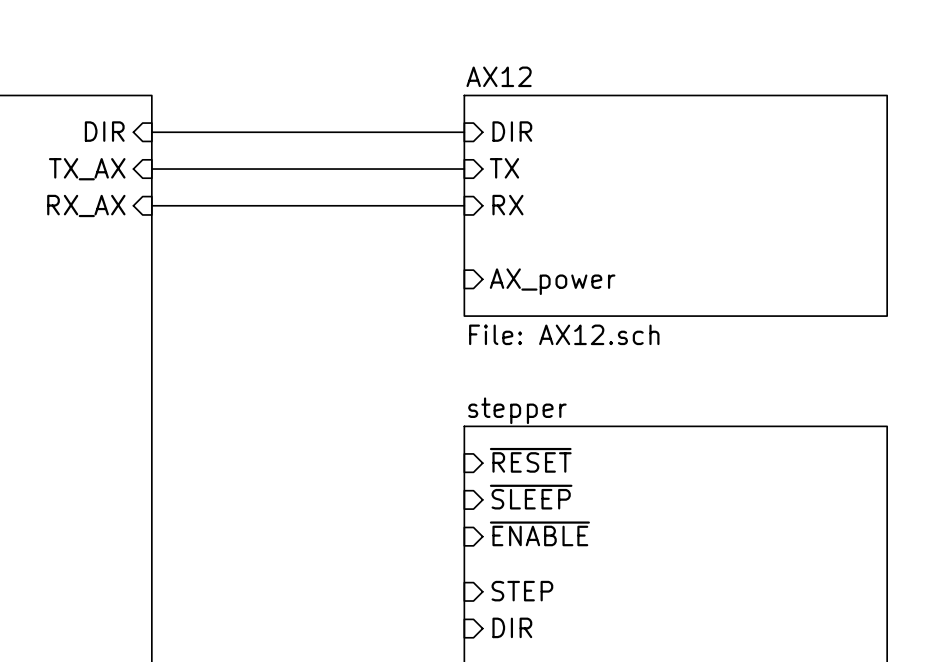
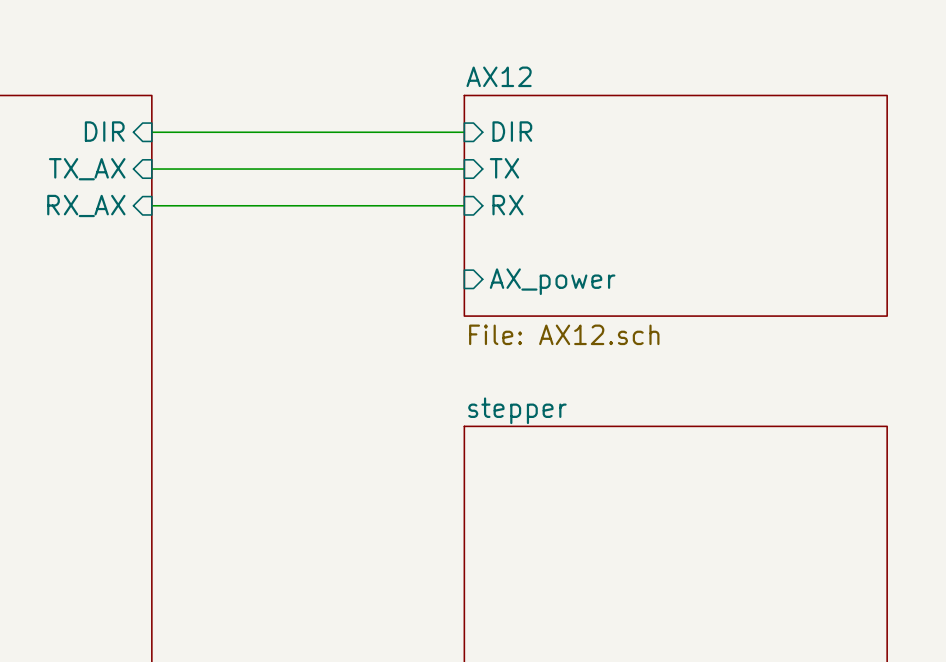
sheet pin: ~{RESET} (530, 460) -> none
sheet pin: ~{SLEEP} (531, 497) -> none
sheet pin: ~{ENABLE} (539, 533) -> none
sheet pin: STEP (522, 591) -> none
sheet pin: DIR (512, 627) -> none

